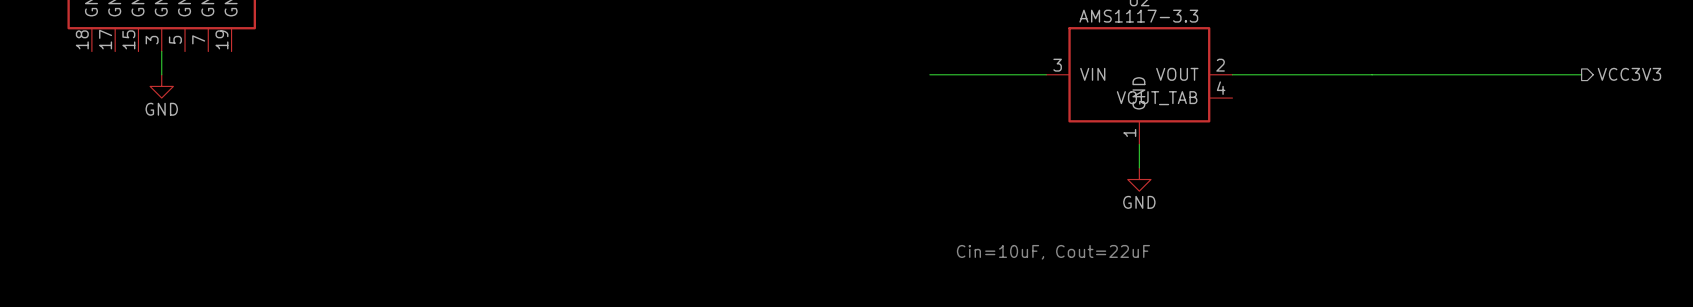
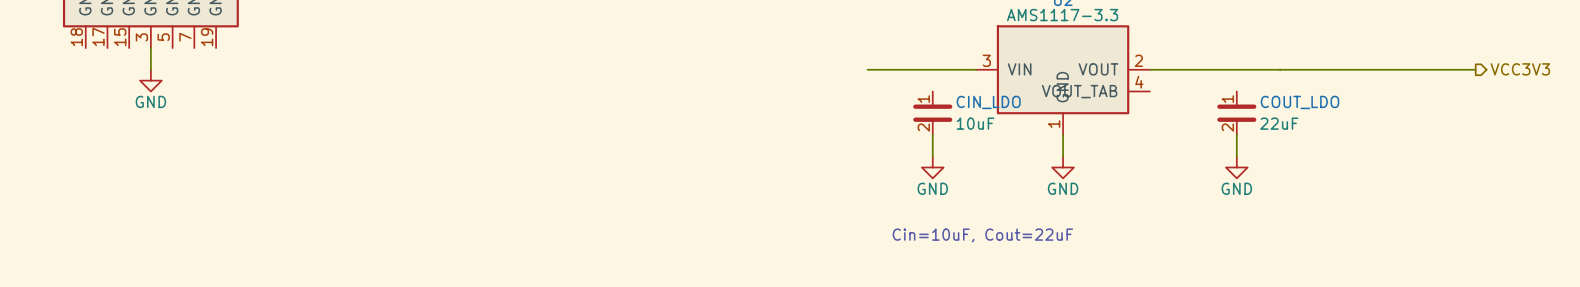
CIN_LDO: none -> 10uF (932, 113)
COUT_LDO: none -> 22uF (1236, 113)
wire: none -> (932, 134) (932, 156)
wire: none -> (1236, 134) (1236, 156)
power symbol: none -> GND (932, 167)
power symbol: none -> GND (1236, 167)

